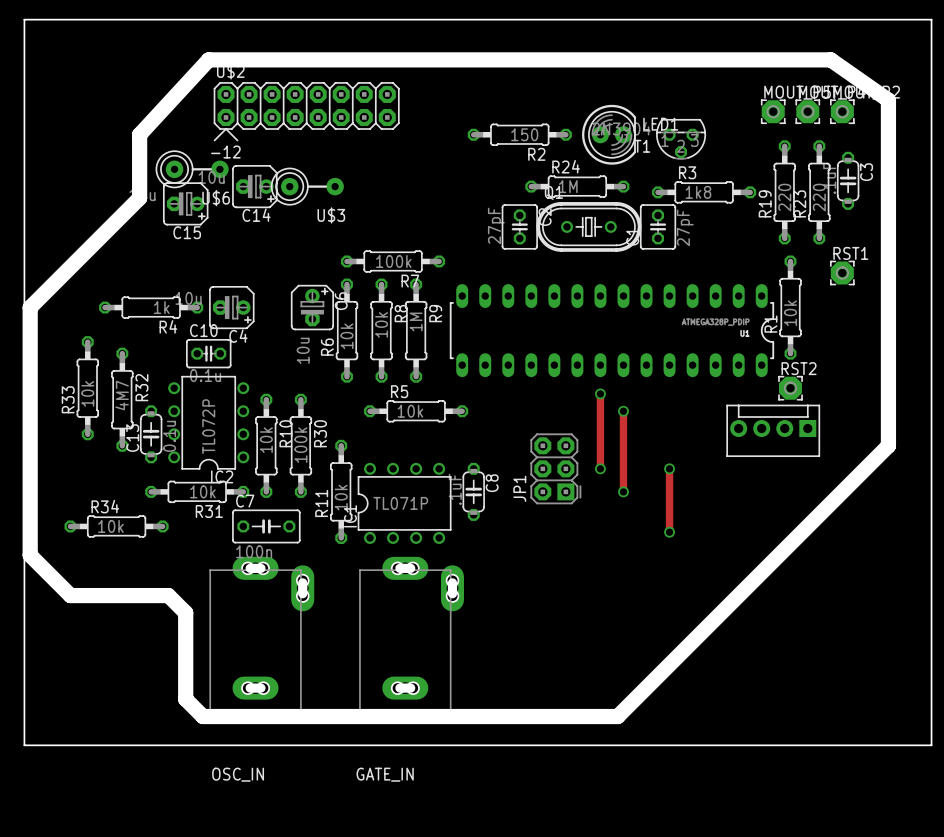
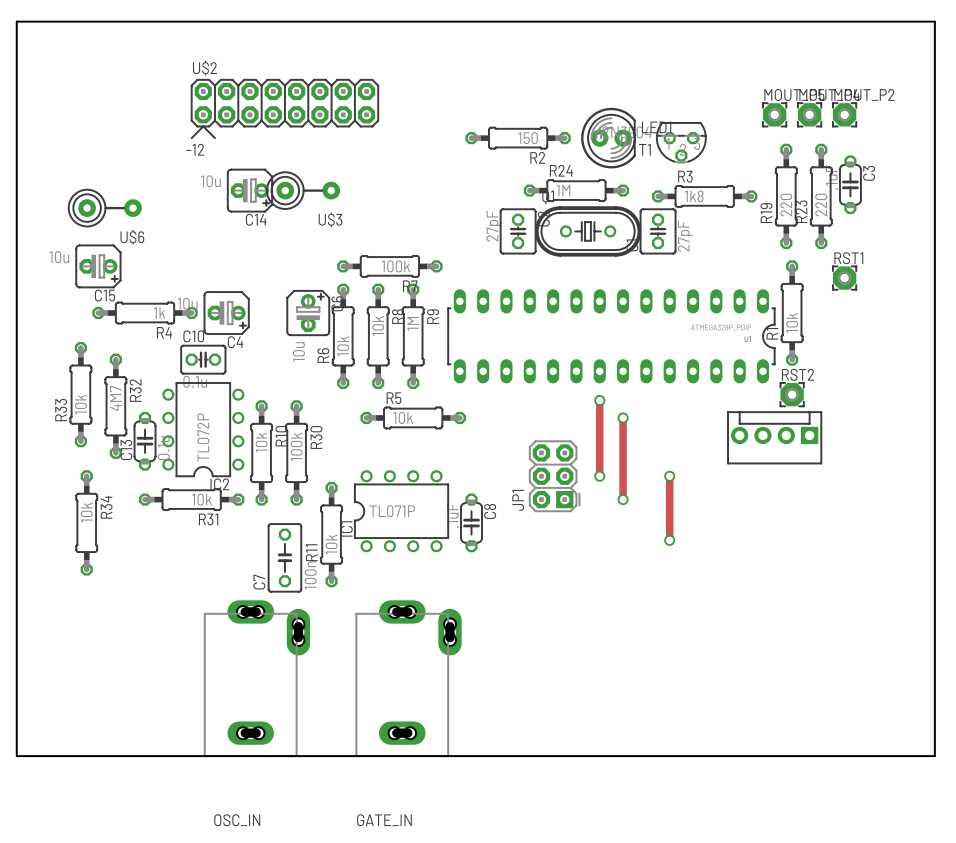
board edge: (208, 59) (830, 59) (888, 100) (888, 445) (617, 716) (202, 716) (185, 699) (185, 612) (168, 595) (70, 595) (30, 555) (30, 307) (139, 198) (139, 134) (208, 59) -> none
U$2 position: (306, 111) -> (284, 108)
U$6 position: (192, 169) -> (105, 208)
C15 position: (185, 203) -> (98, 266)
R11 position: (341, 491) -> (331, 534)
C8 position: (473, 491) -> (471, 522)
R34 rotation: 0° (116, 526) -> 90° clockwise (86, 522)
C7 rotation: 0° (266, 526) -> 90° counterclockwise (284, 557)
OSC_IN position: (261, 634) -> (257, 678)
GATE_IN position: (411, 634) -> (408, 678)

